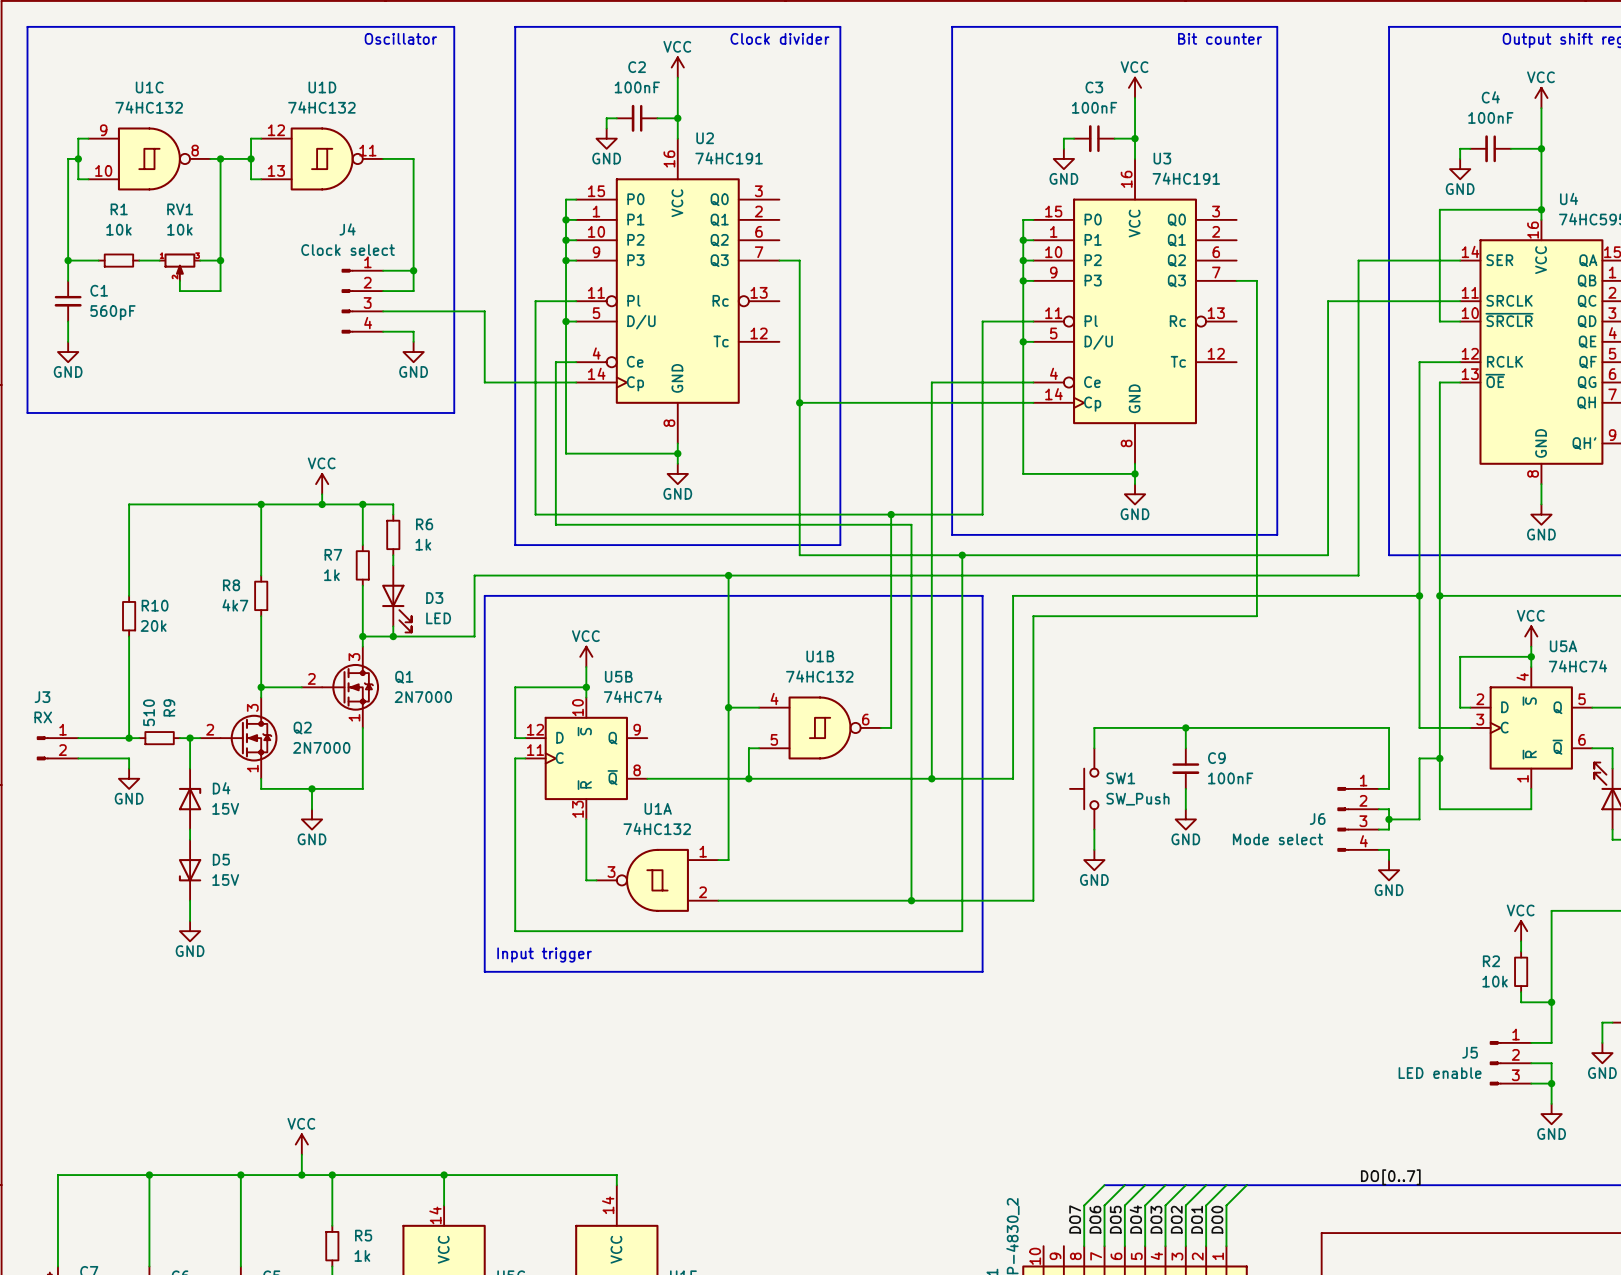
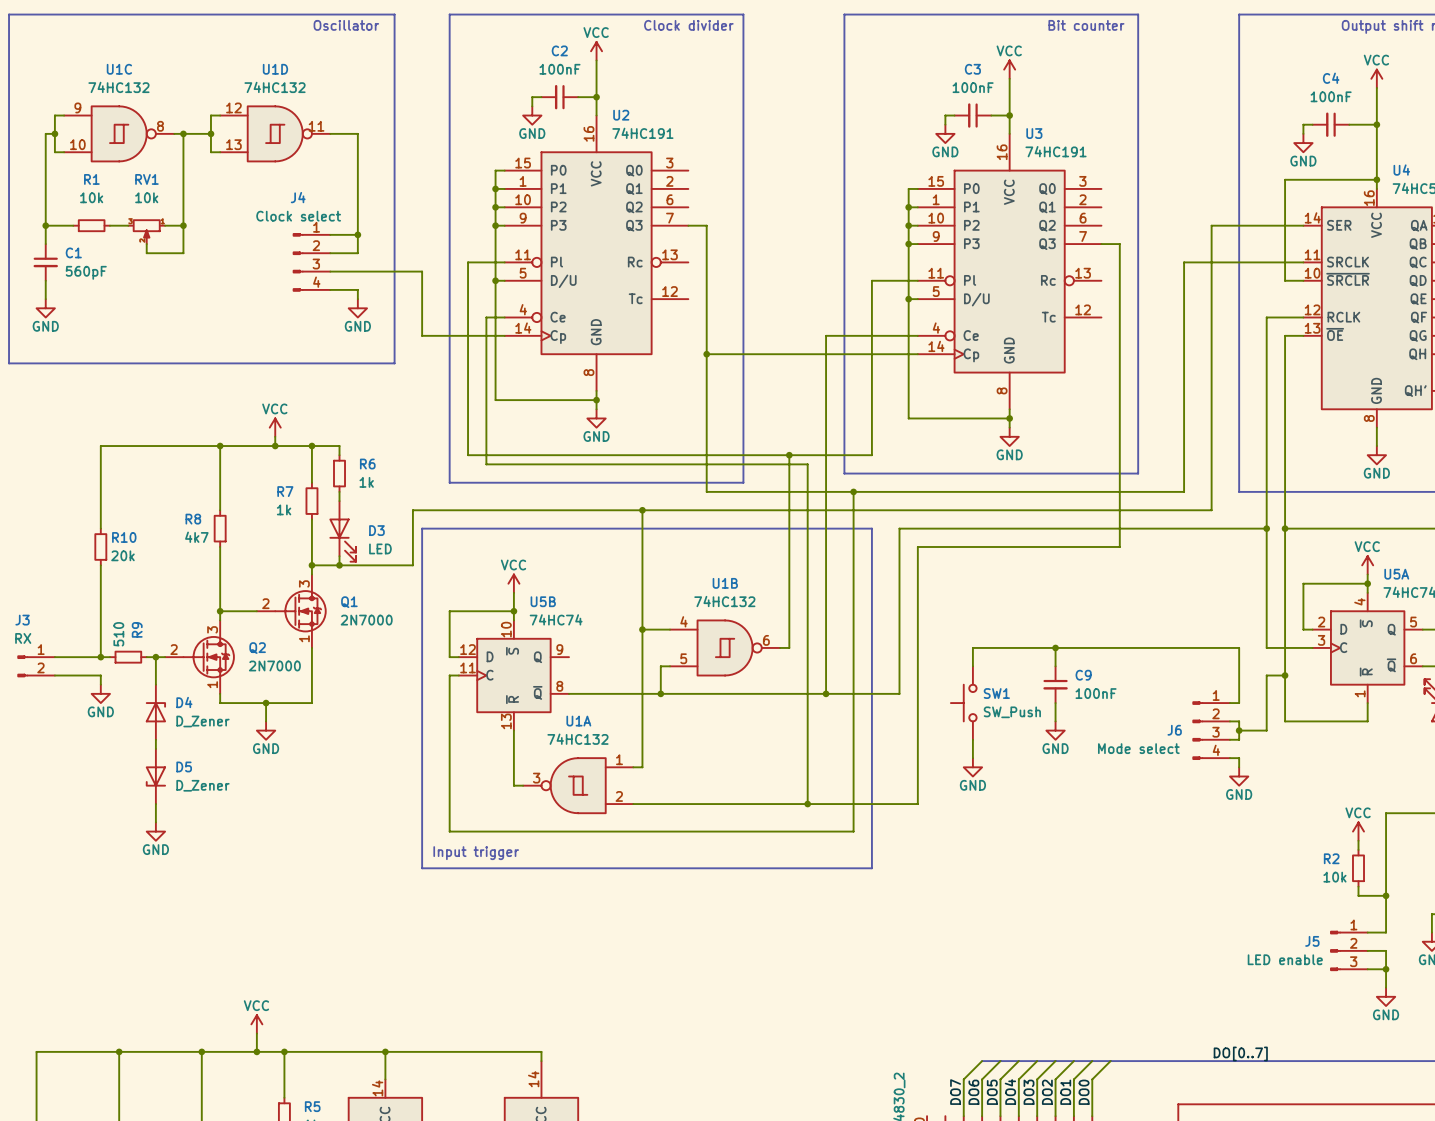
RV1 flip: as is (179, 263) -> left-right (146, 228)
D4 value: 15V (225, 808) -> D_Zener (202, 721)
D5 value: 15V (225, 879) -> D_Zener (202, 785)

